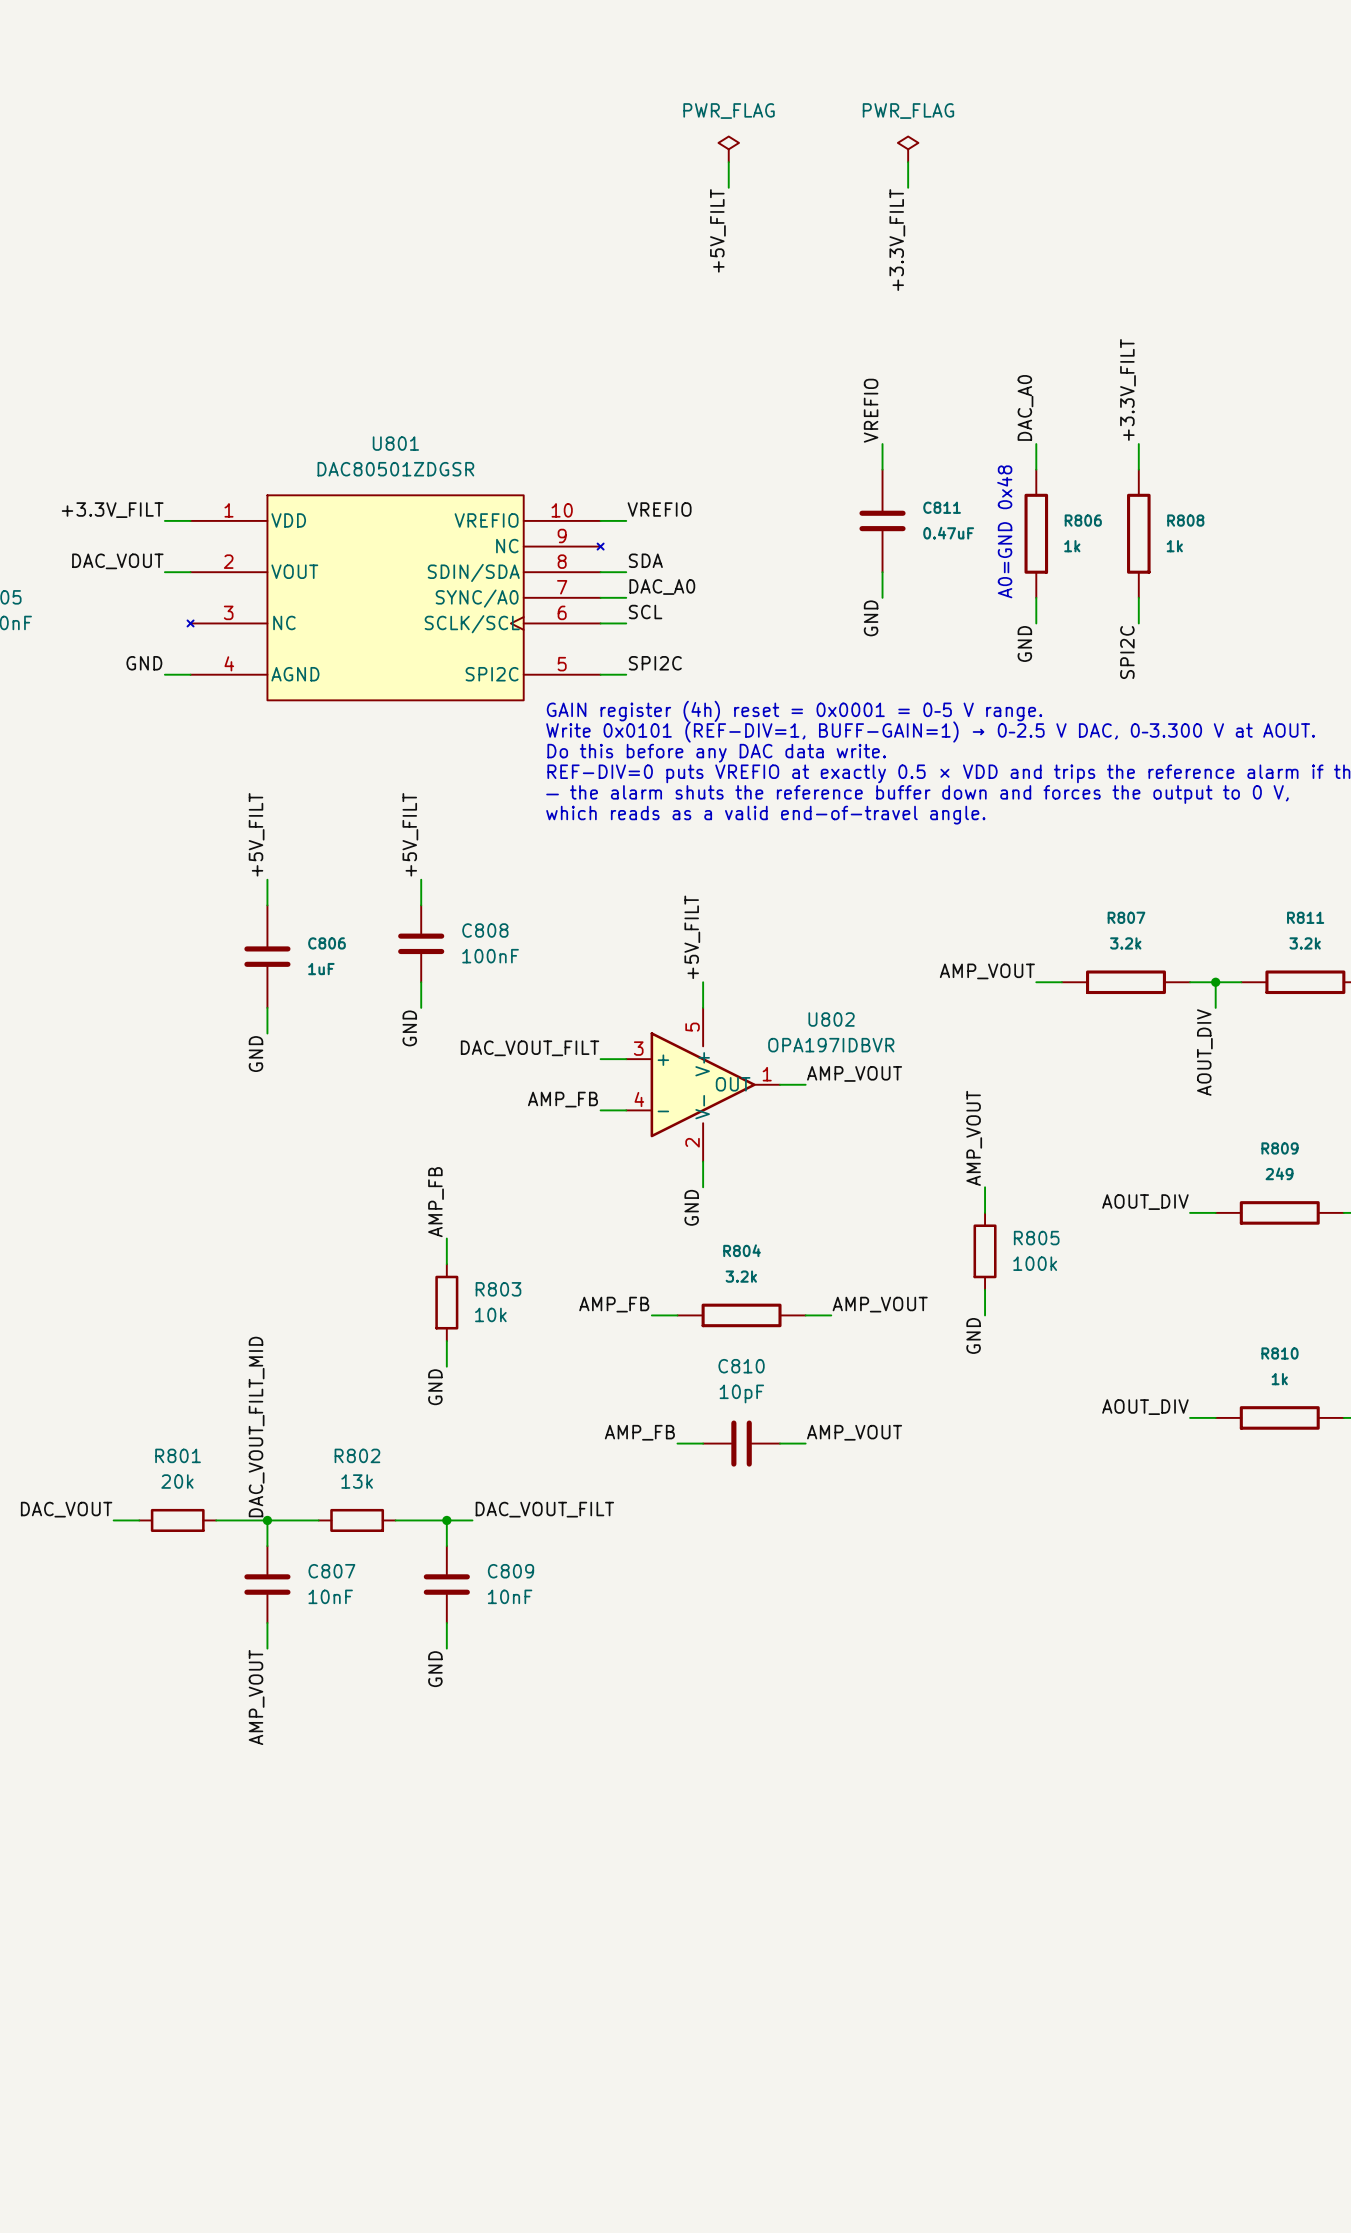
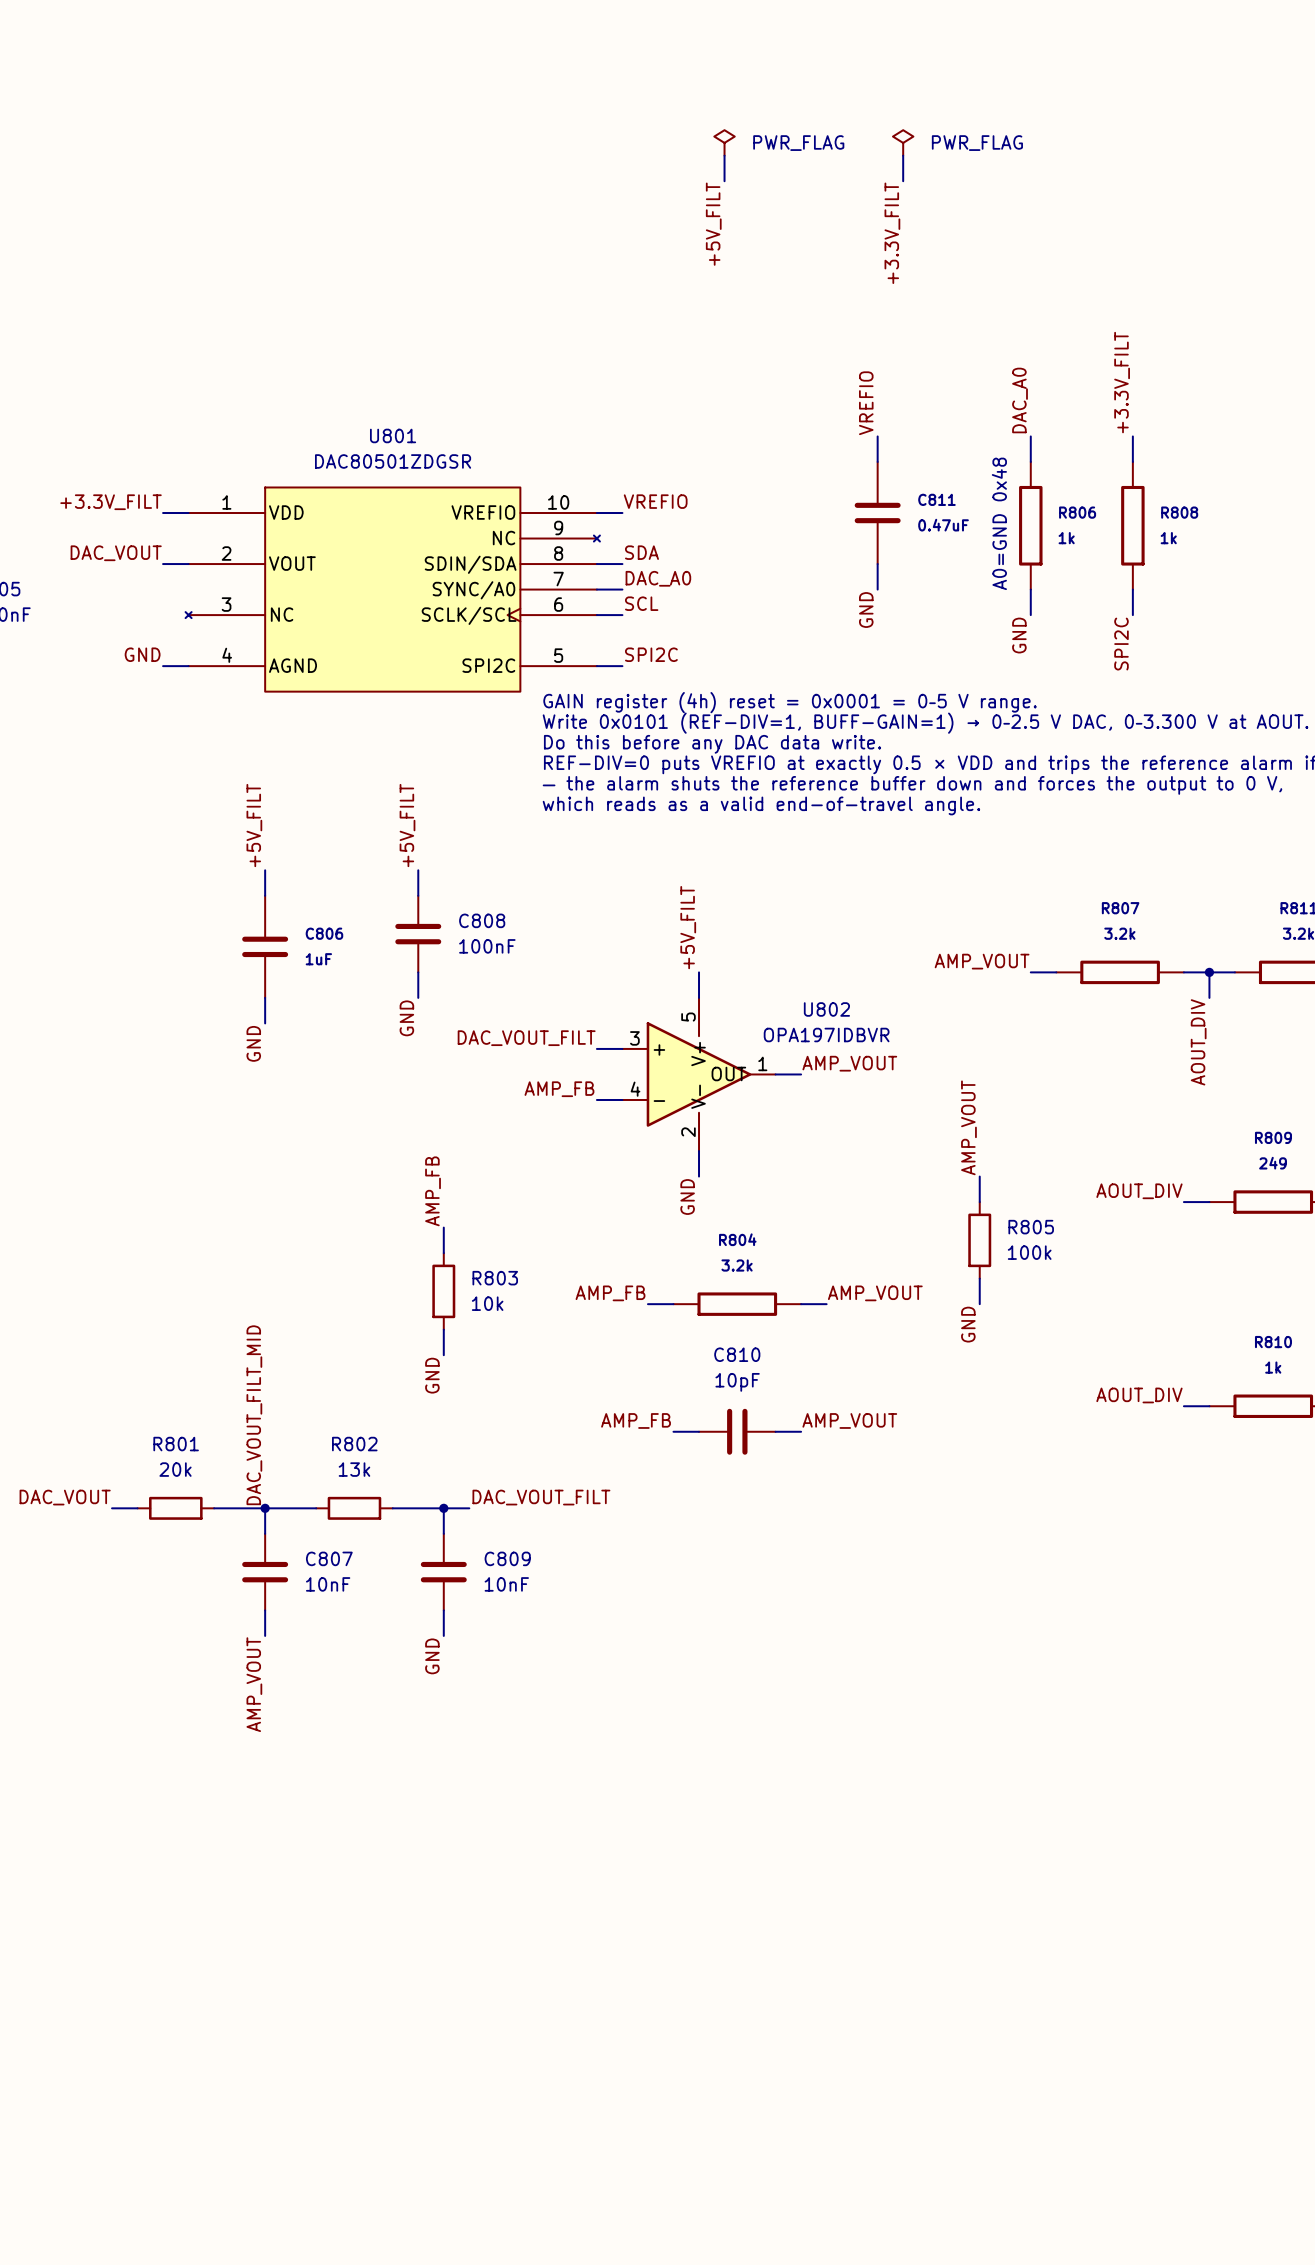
power symbol text position: PWR_FLAG (729, 111) -> PWR_FLAG (798, 143)
power symbol text position: PWR_FLAG (908, 111) -> PWR_FLAG (977, 143)

